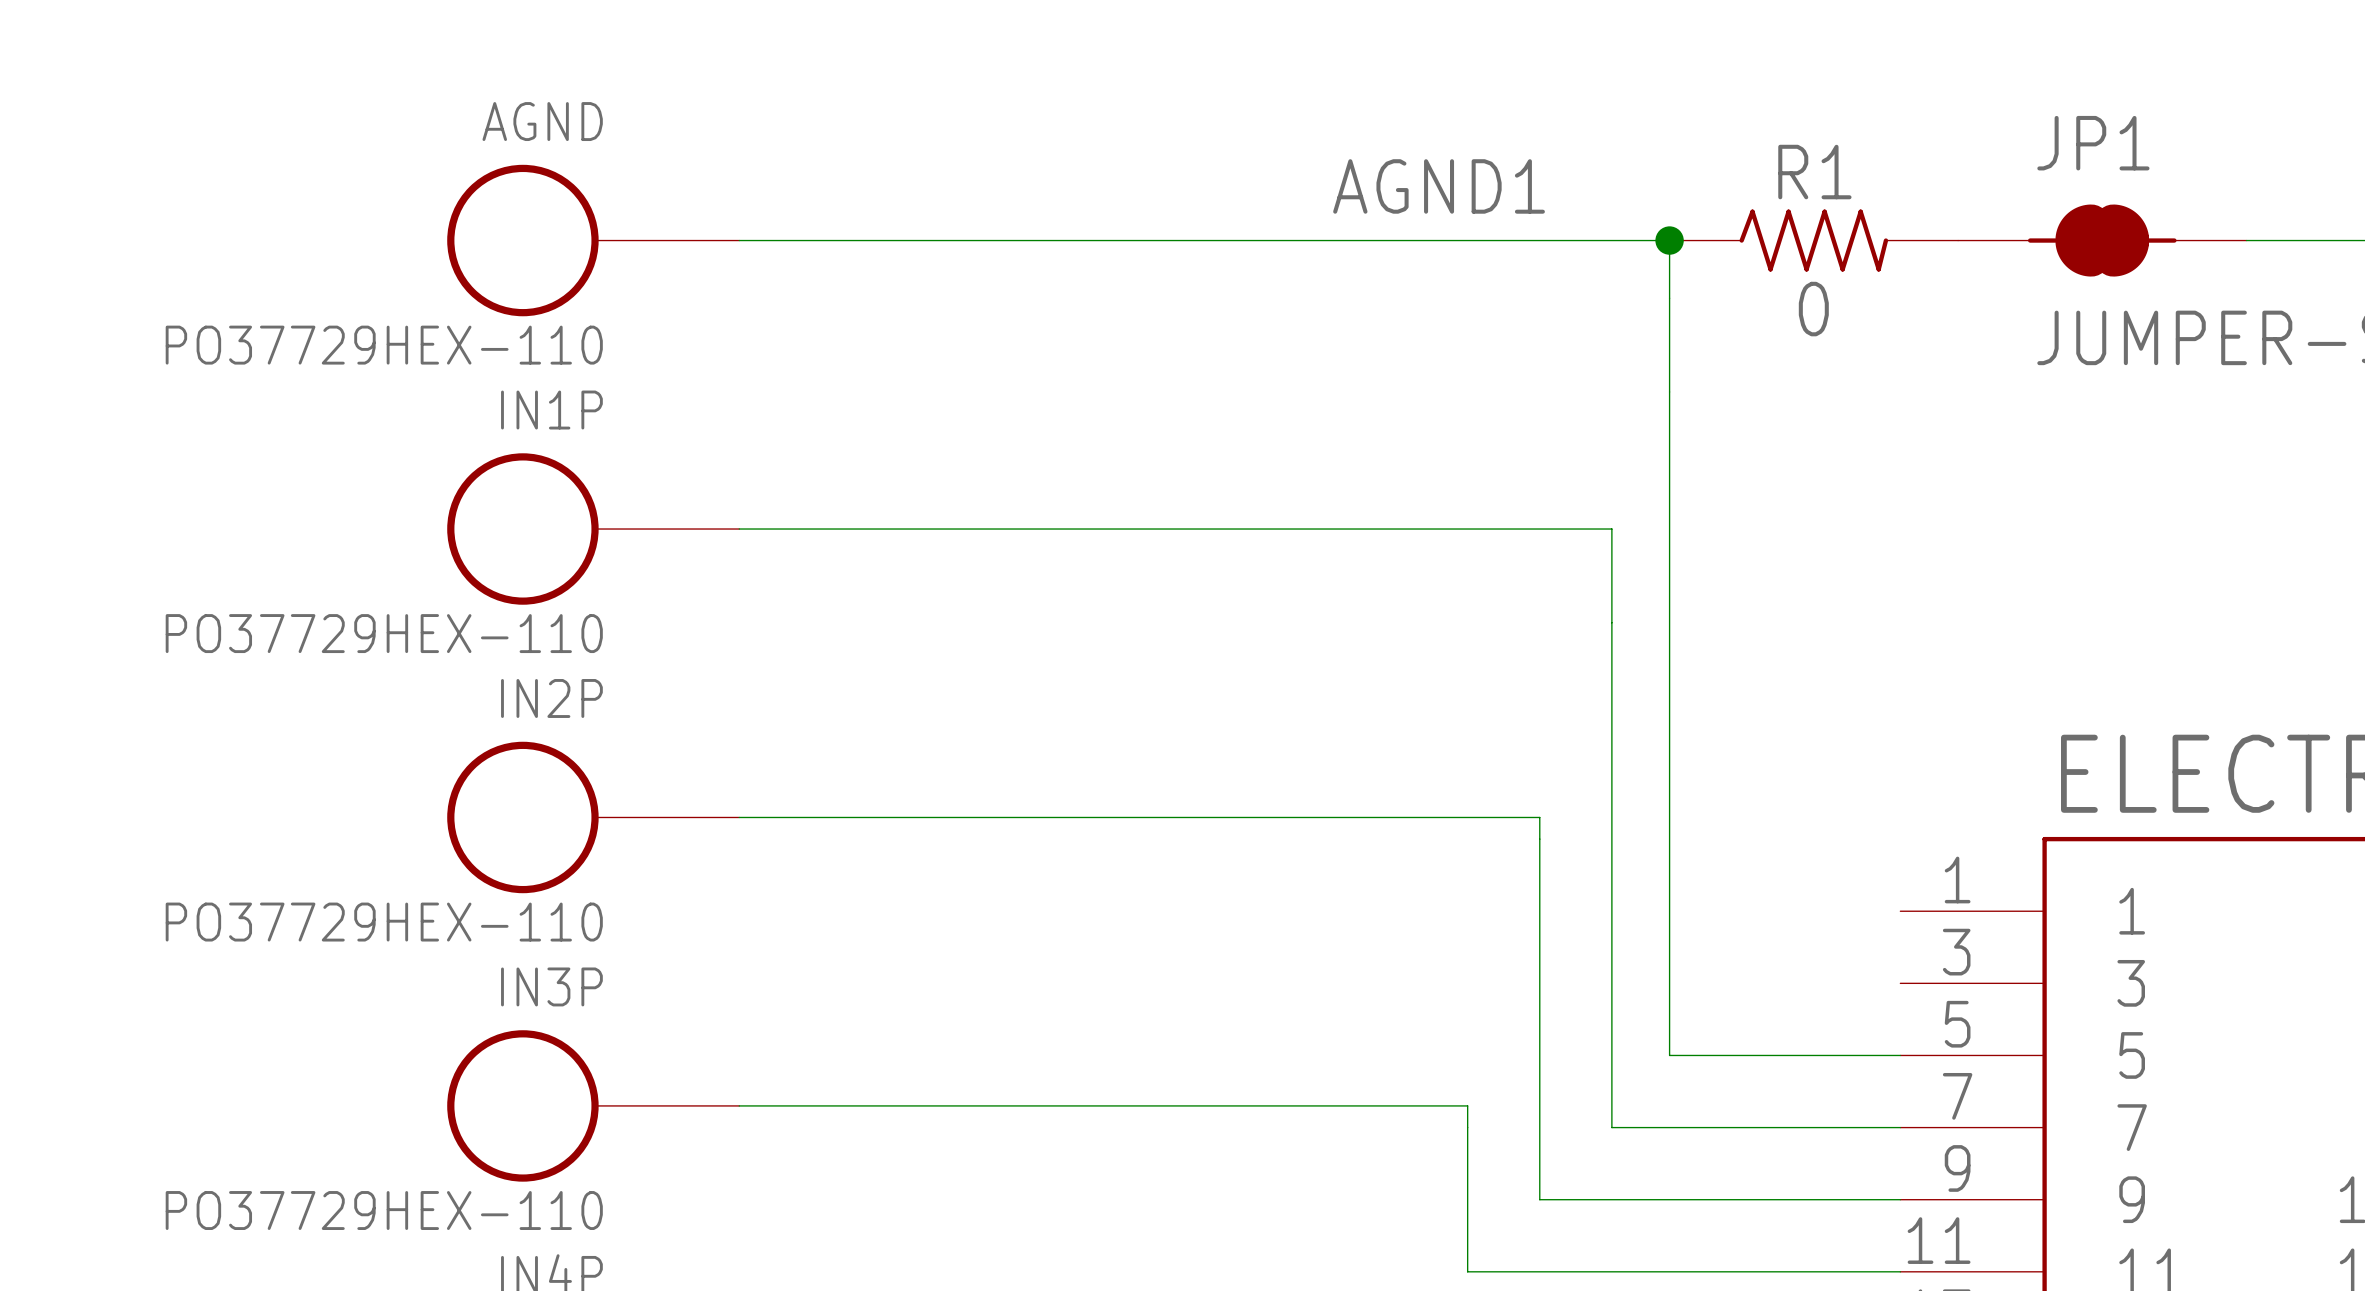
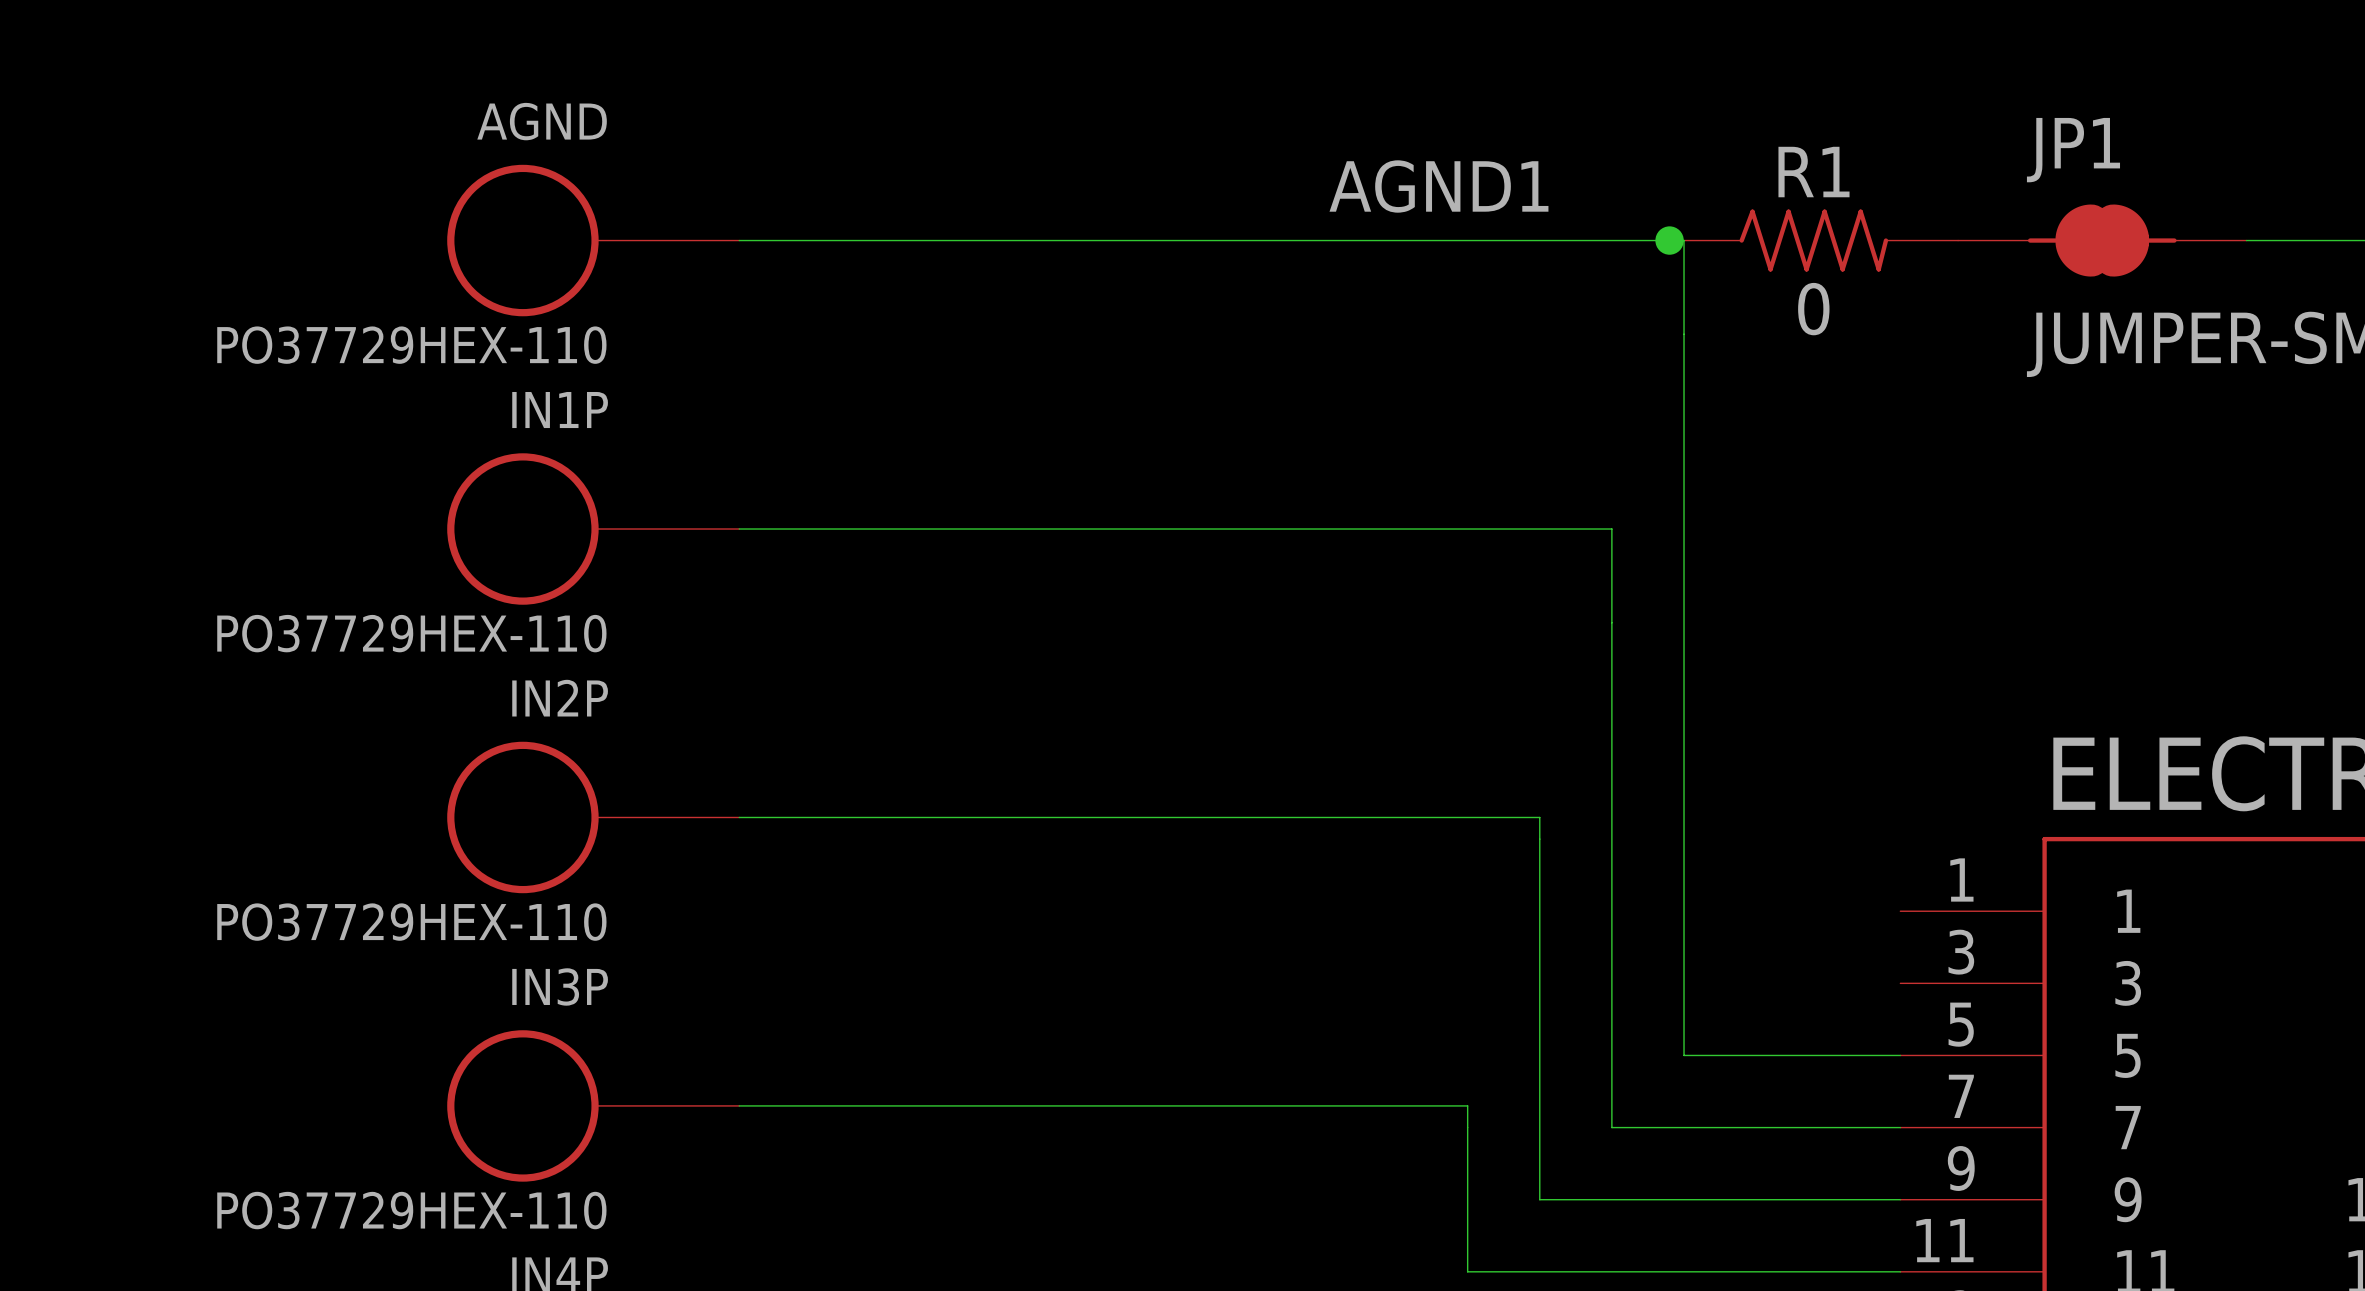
wire: (1669, 240) (1669, 1055) (1684, 1055) -> (1669, 240) (1684, 240) (1684, 1055)

